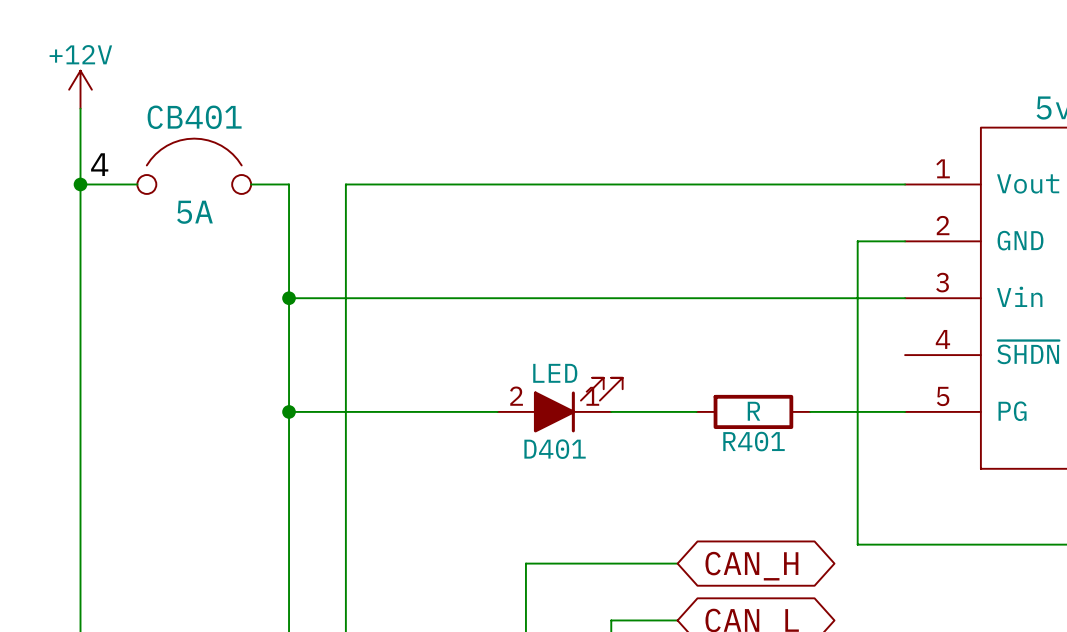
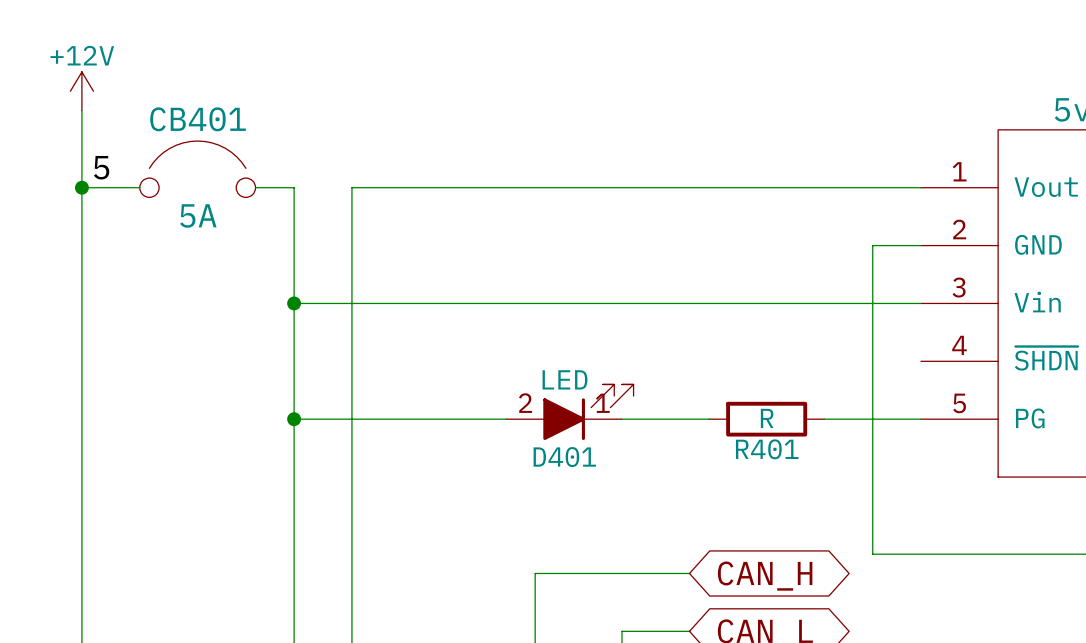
label: 4 (99, 164) -> 5 (101, 167)

